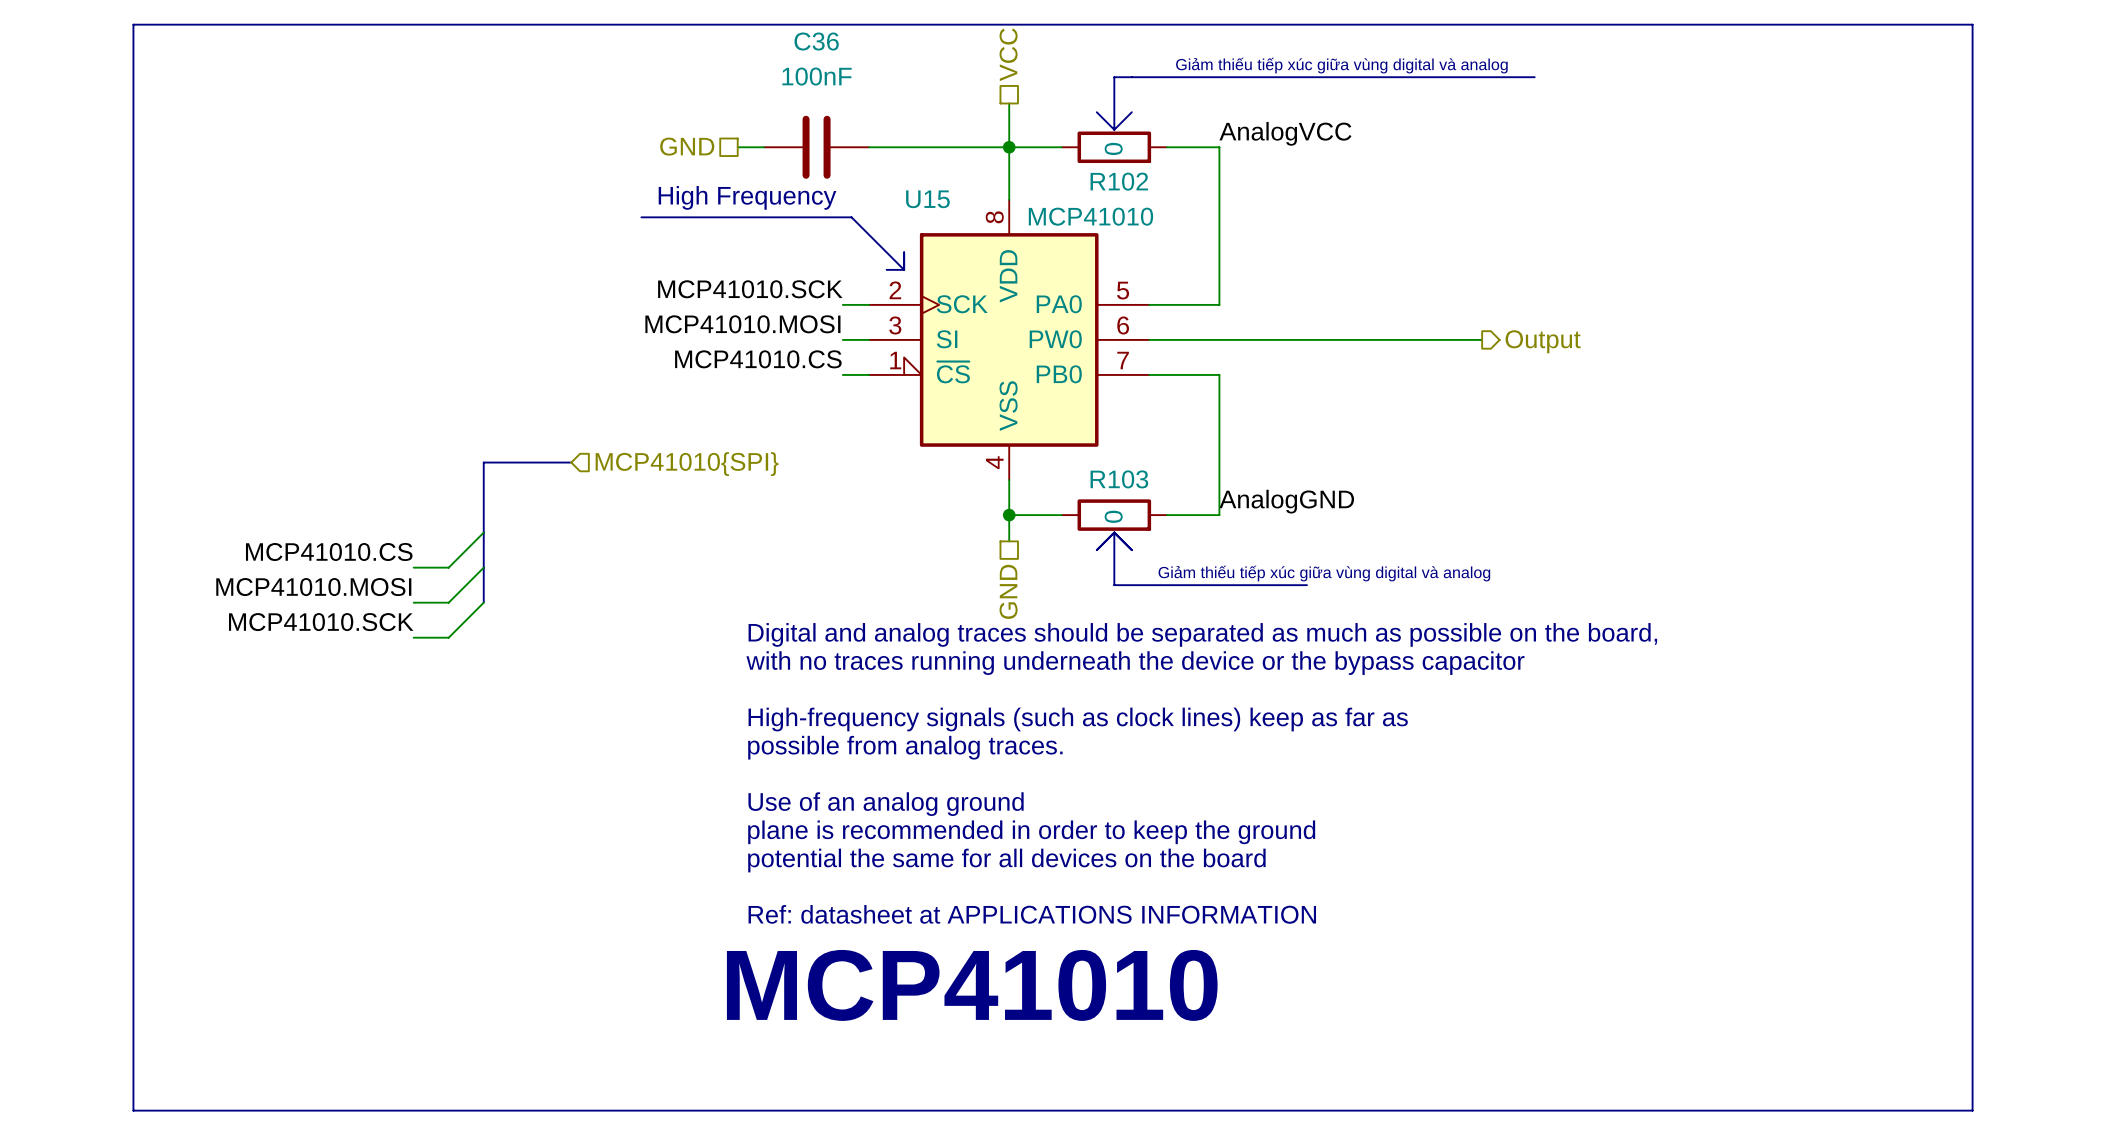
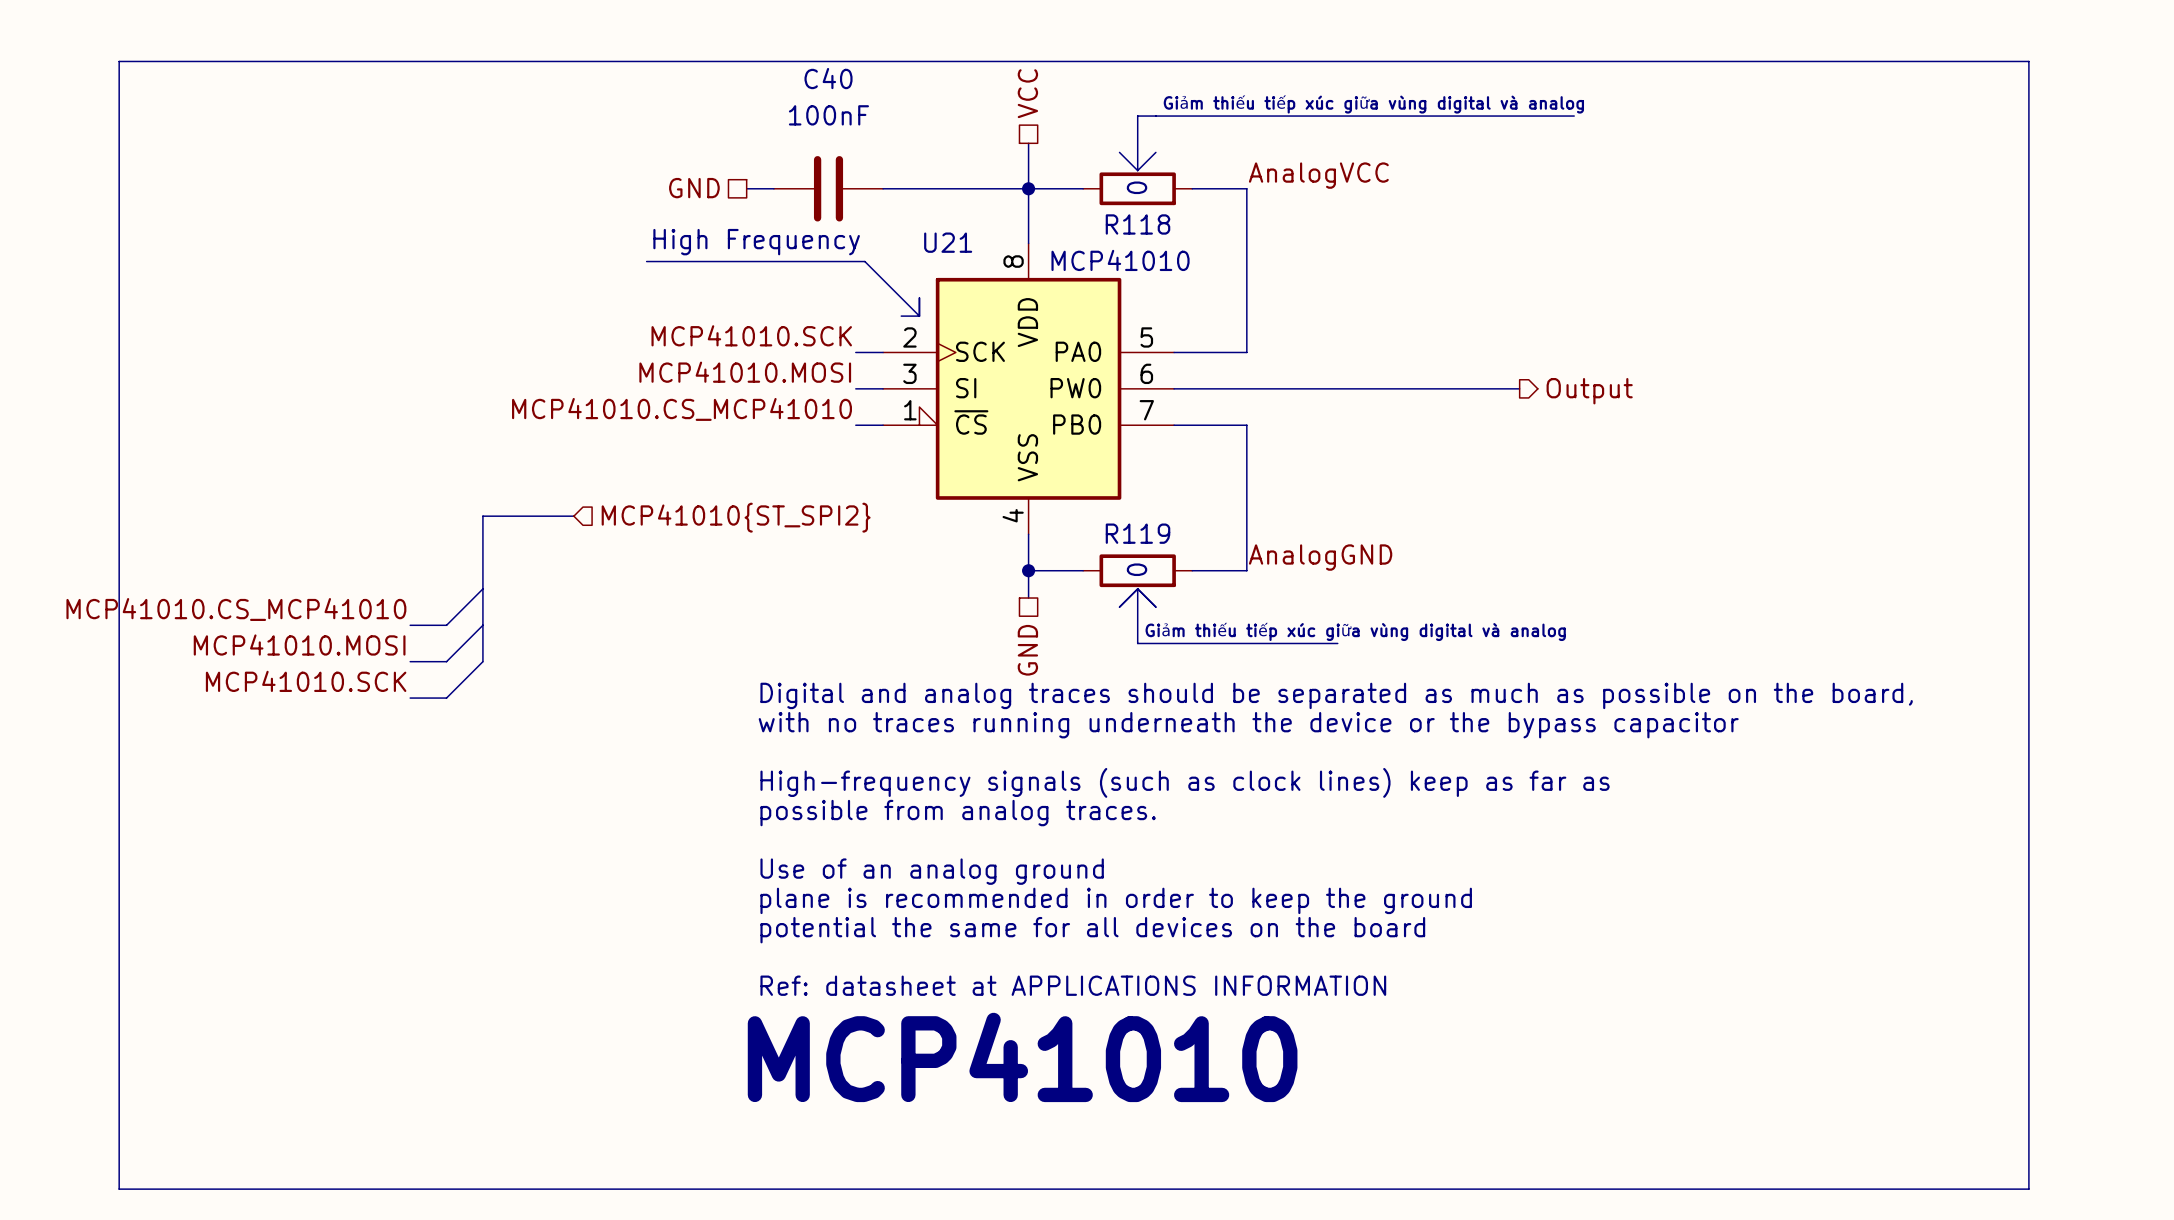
C36 name: C36 (816, 41) -> C40 (828, 78)
R102 name: R102 (1119, 181) -> R118 (1138, 224)
U15 name: U15 (927, 199) -> U21 (948, 242)
label: MCP41010.CS (758, 359) -> MCP41010.CS_MCP41010 (682, 409)
hierarchical label: MCP41010{SPI} (687, 464) -> MCP41010{ST_SPI2} (736, 517)
R103 name: R103 (1119, 479) -> R119 (1138, 533)
label: MCP41010.CS (329, 552) -> MCP41010.CS_MCP41010 (236, 609)

